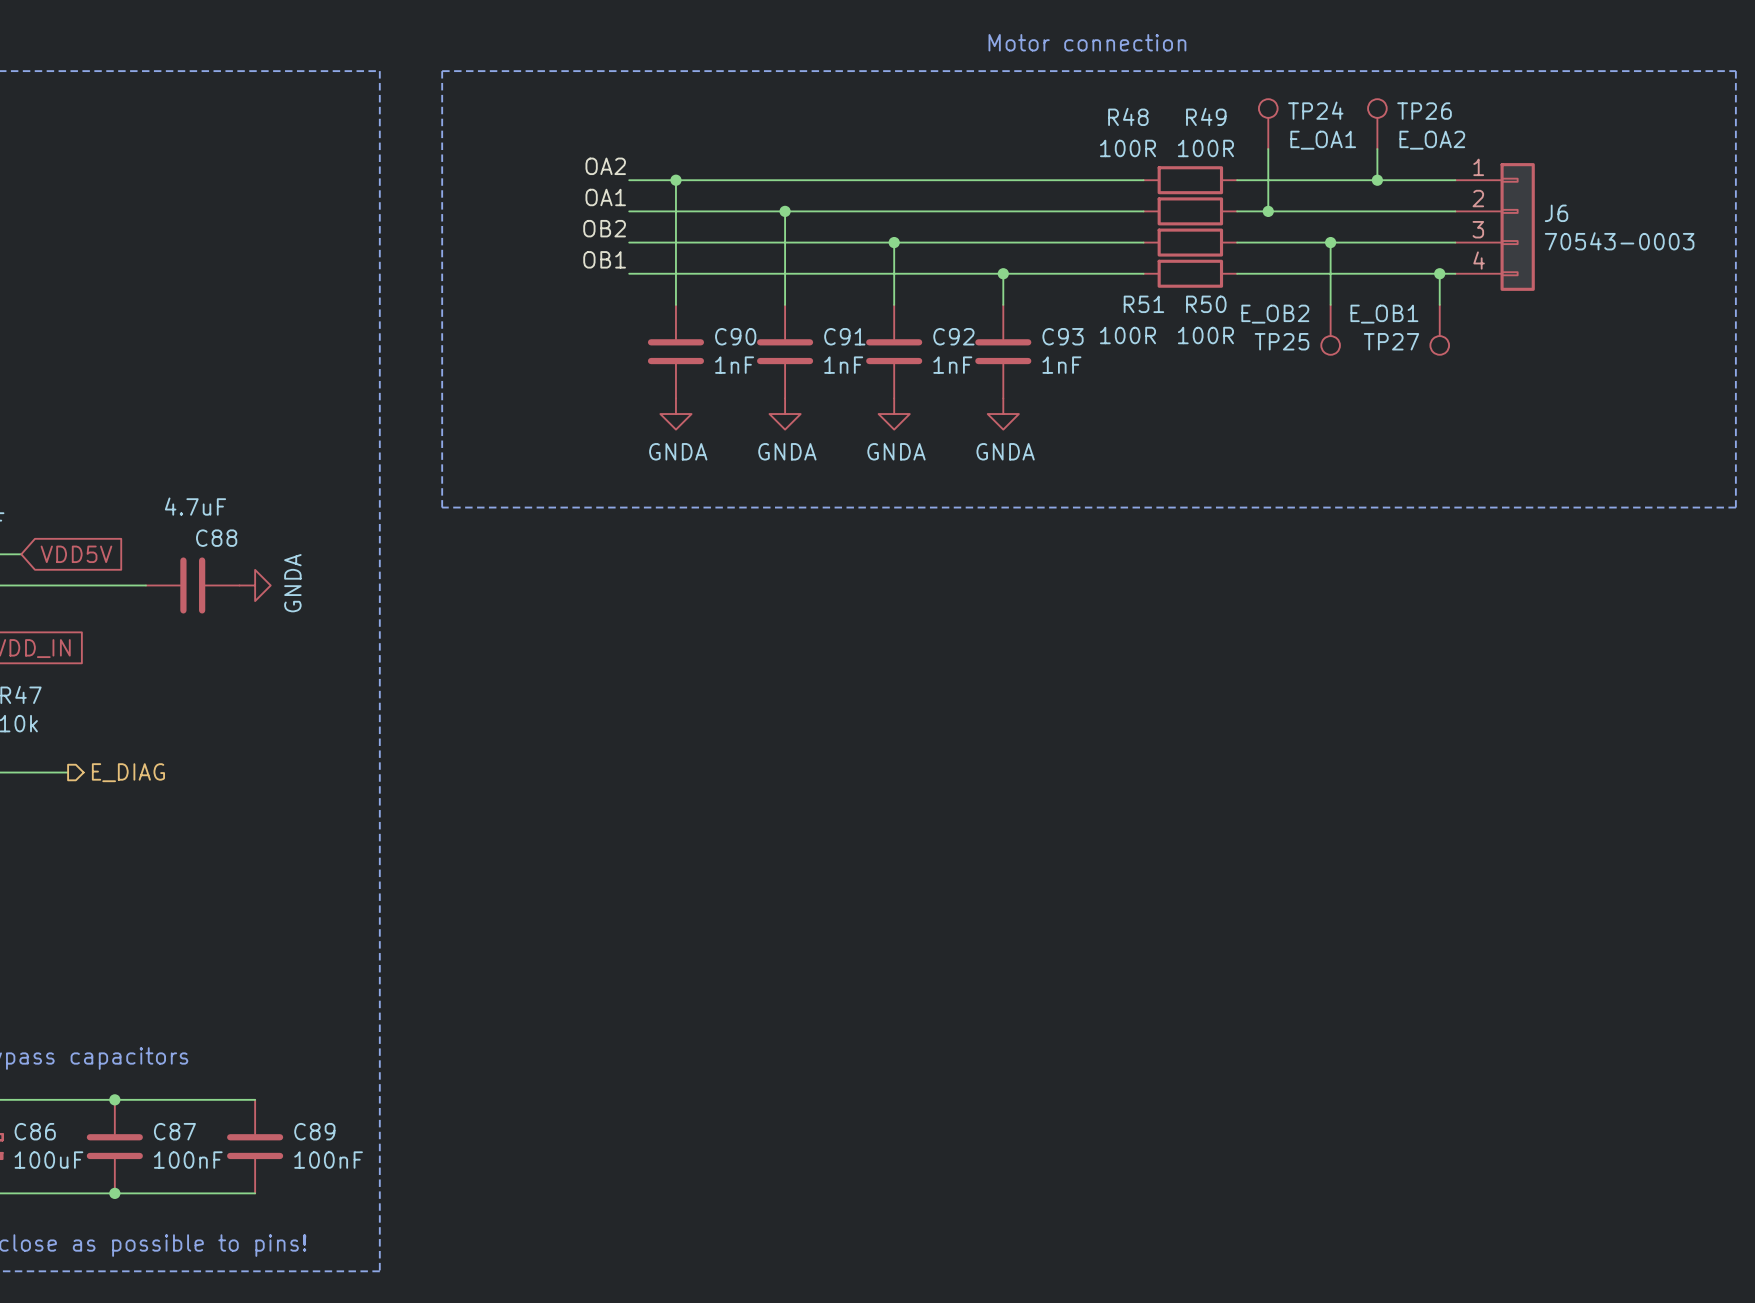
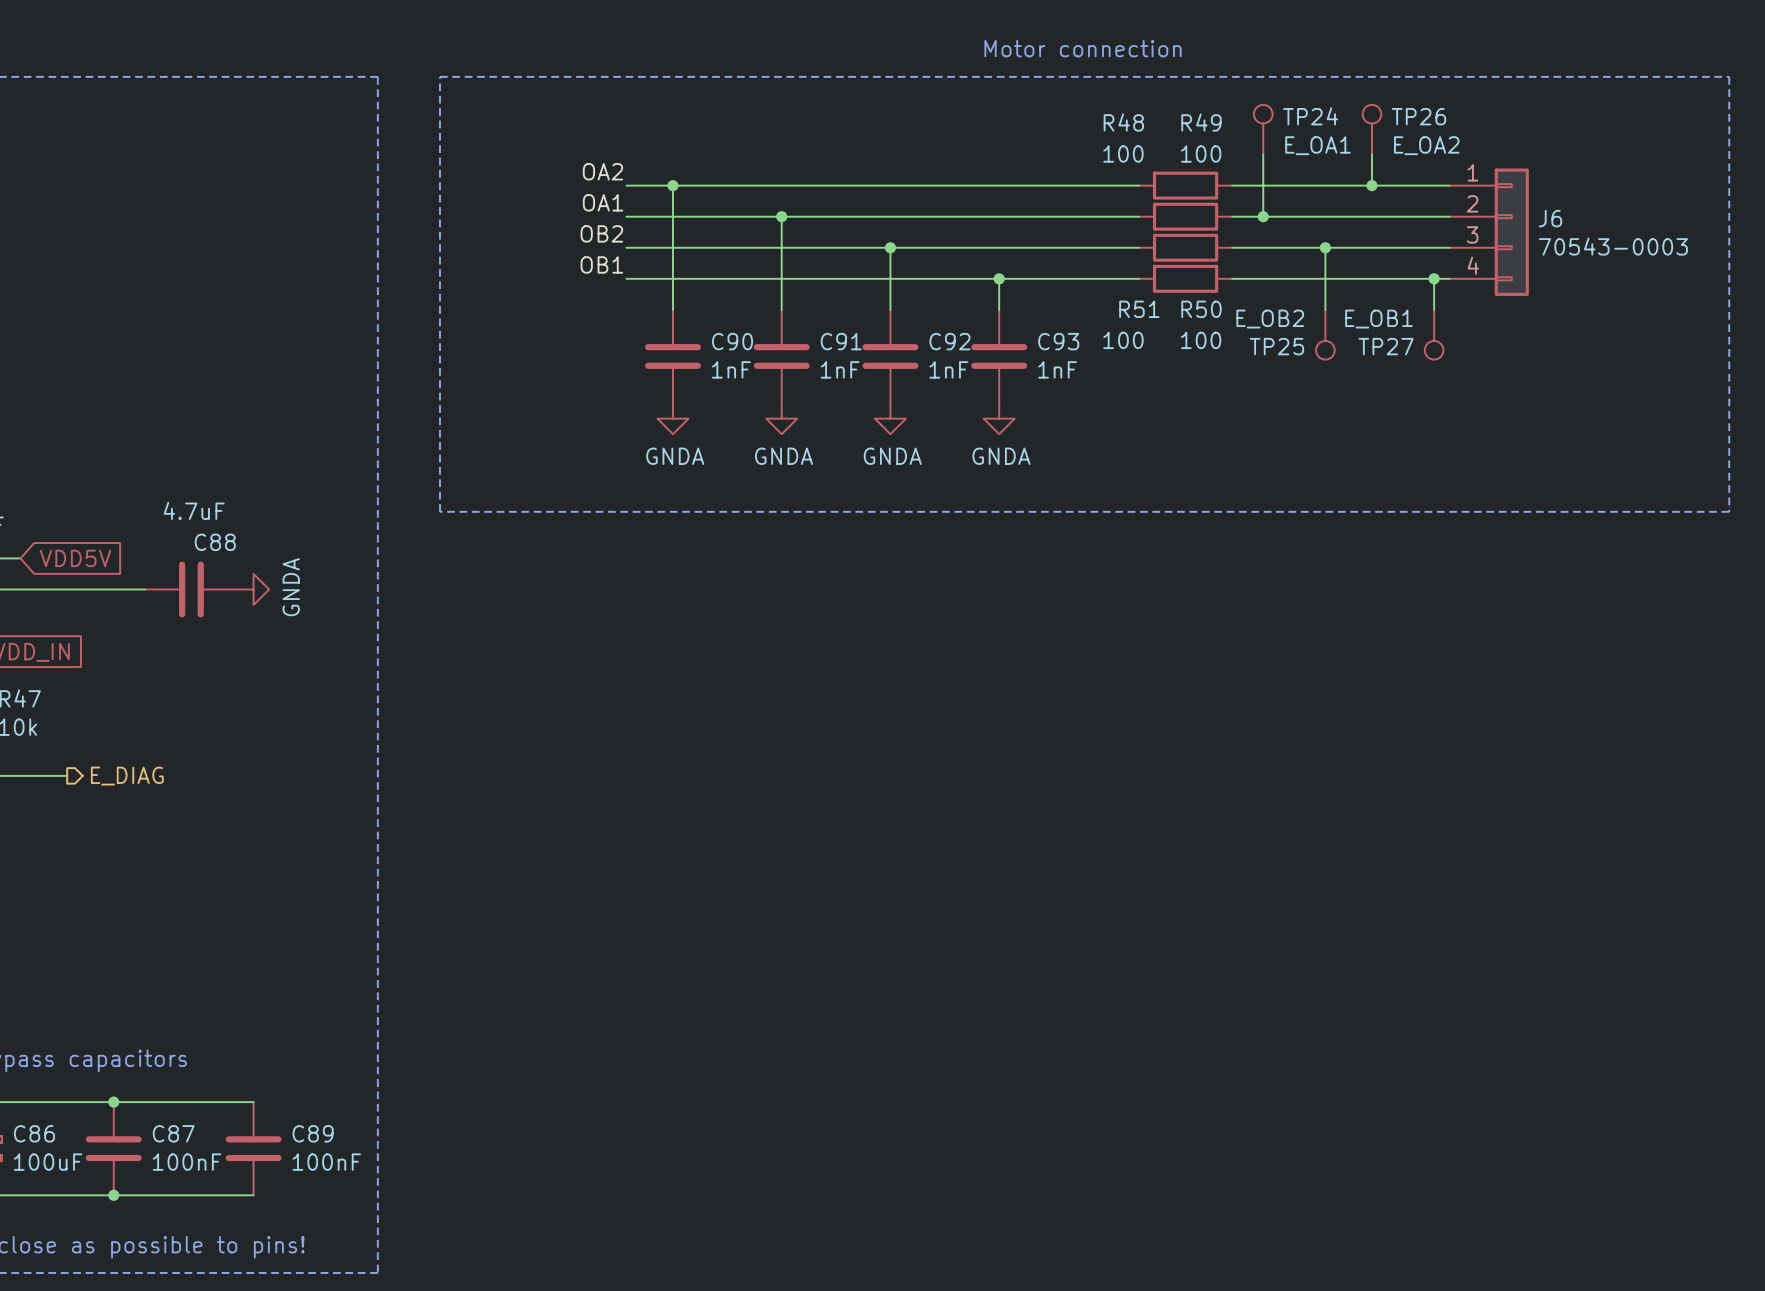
R48 value: 100R (1127, 148) -> 100 (1123, 153)
R49 value: 100R (1205, 148) -> 100 (1201, 153)
R51 value: 100R (1127, 335) -> 100 (1123, 340)
R50 value: 100R (1205, 335) -> 100 (1201, 340)

